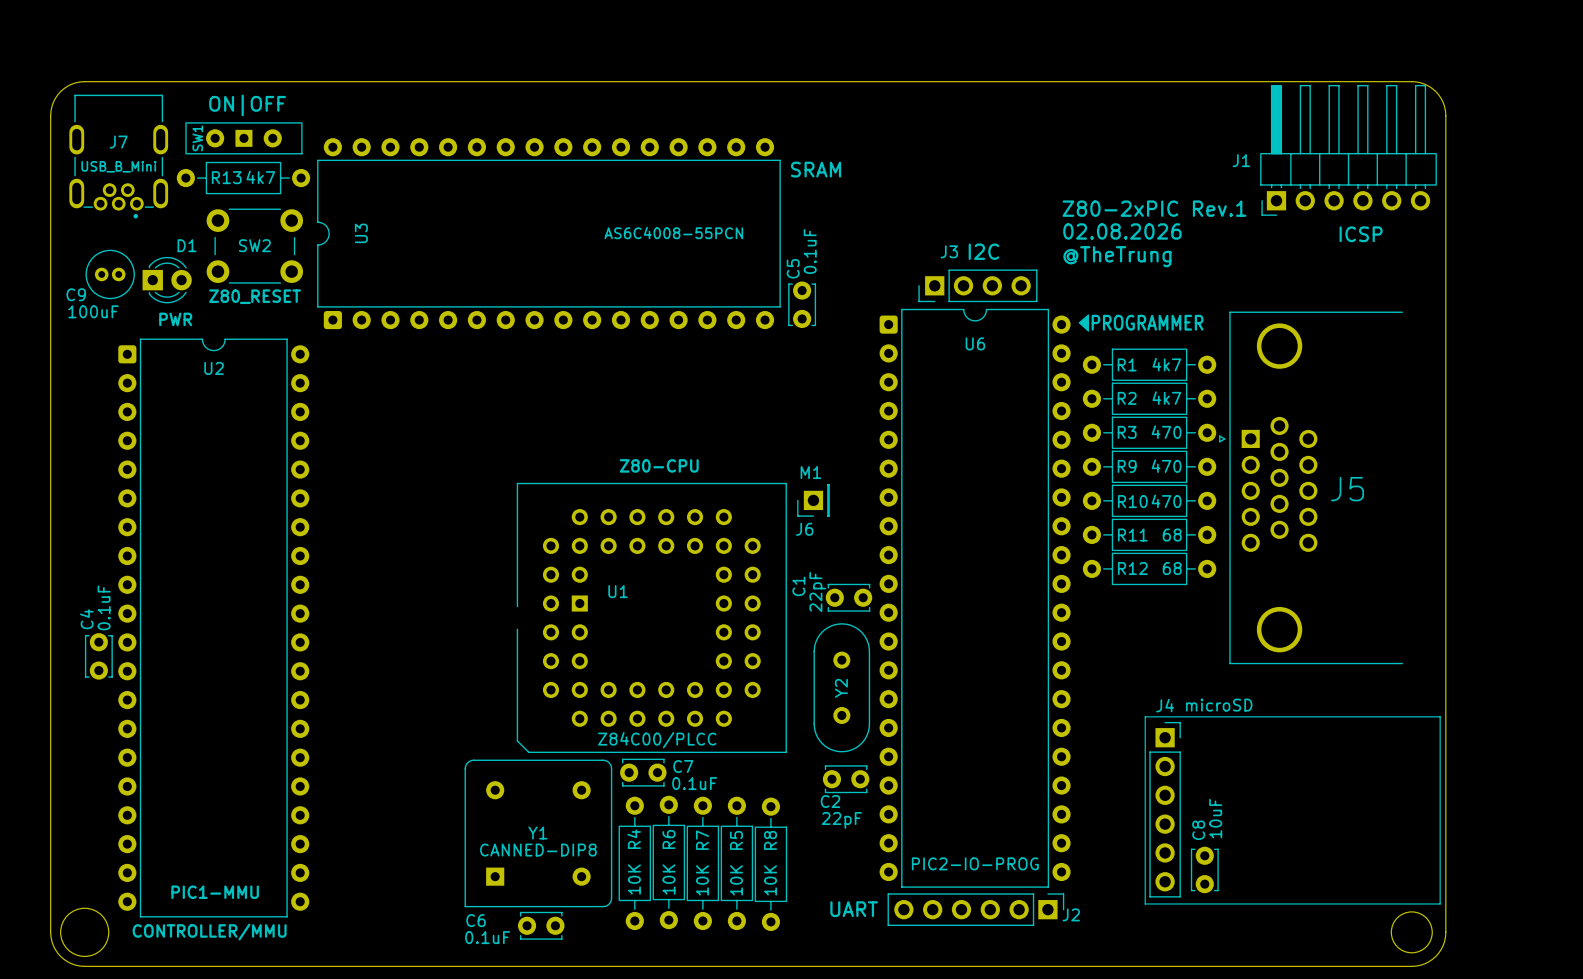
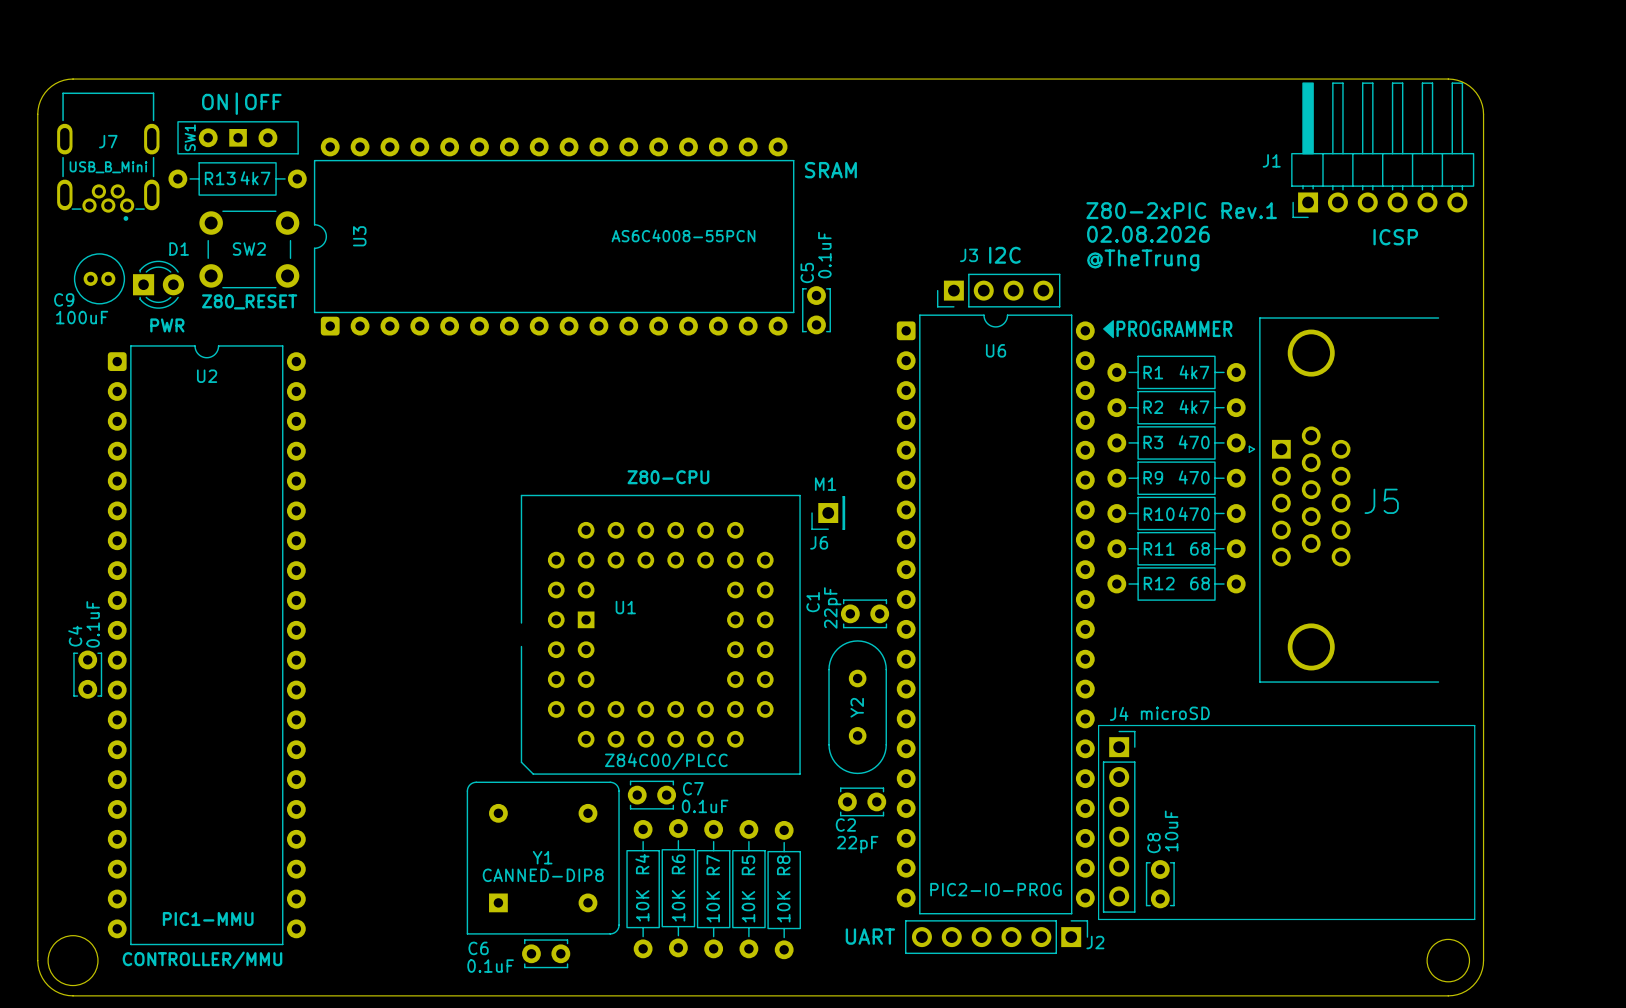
line: (1145, 716) (1440, 716) (1440, 903) (1145, 903) (1145, 716) -> (1098, 725) (1098, 919) (1474, 919) (1474, 725) (1098, 725)
J4 position: (1165, 809) -> (1119, 821)
C8 position: (1204, 869) -> (1160, 884)

